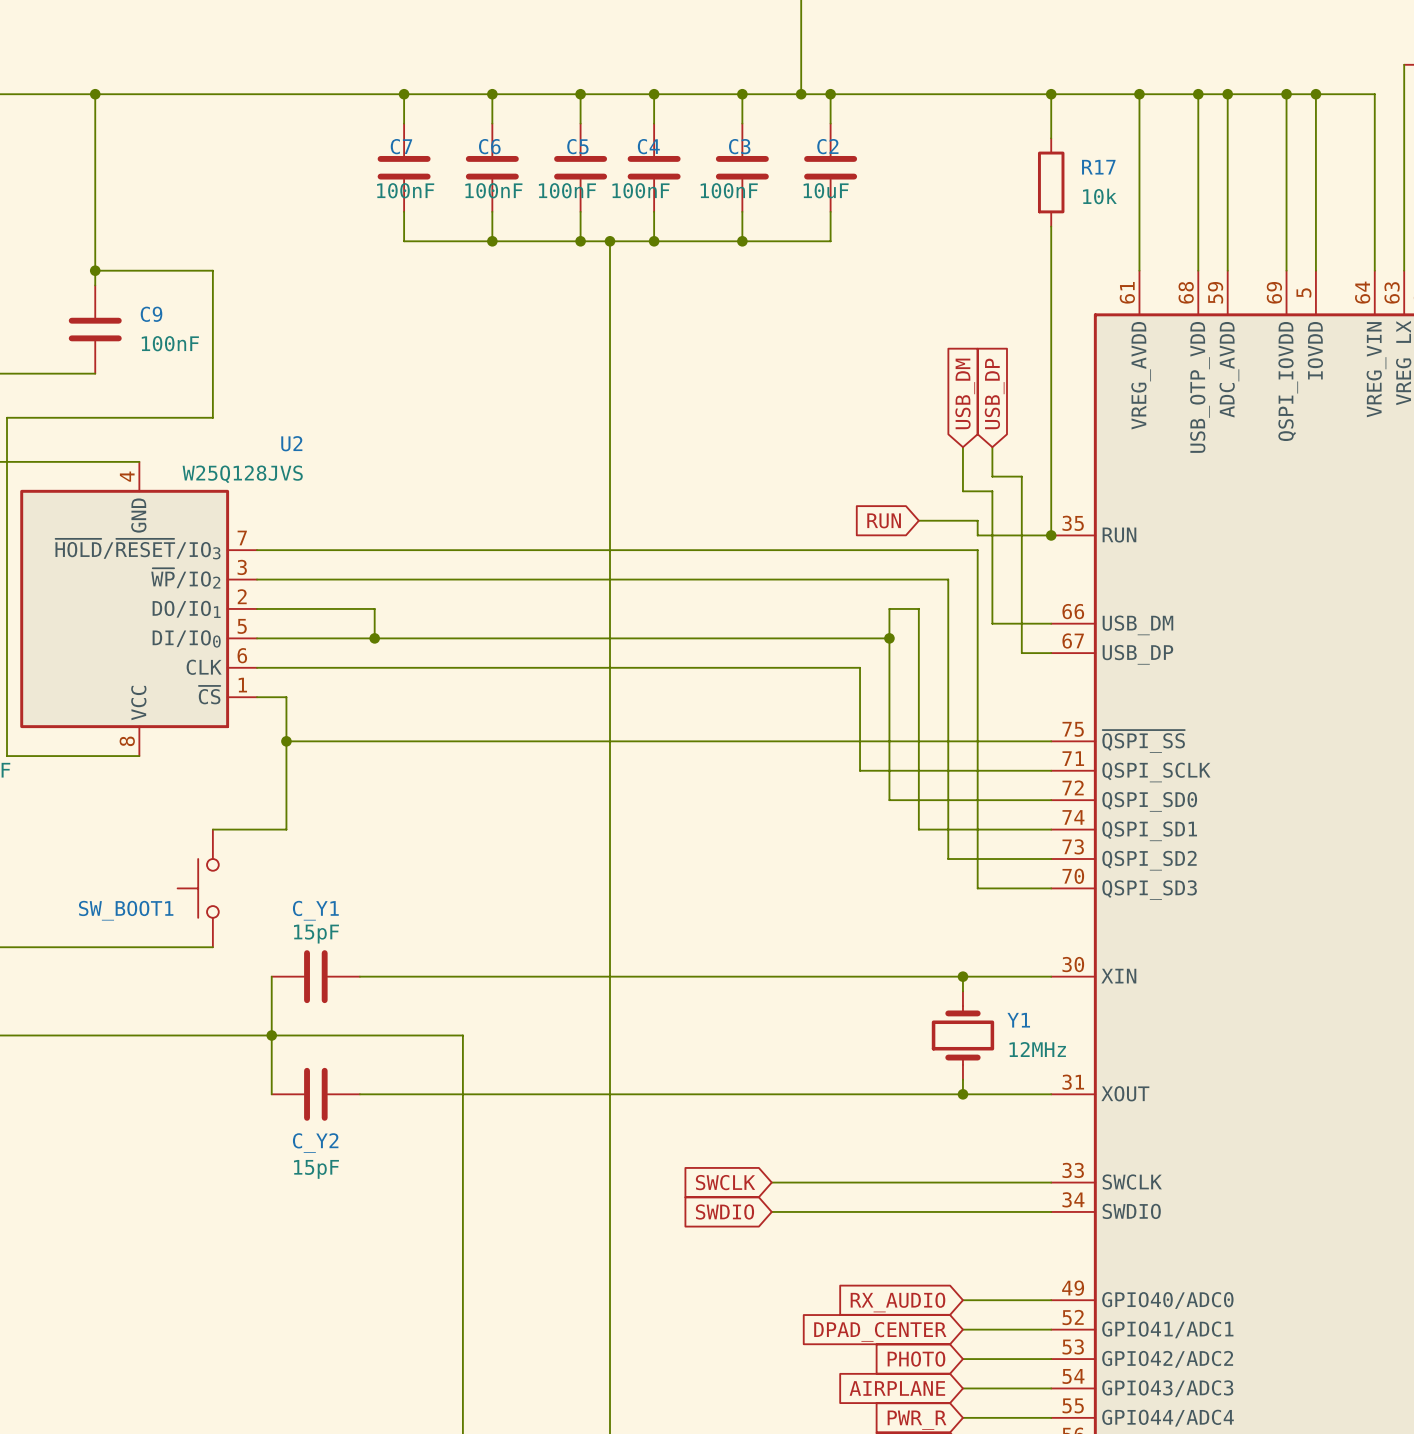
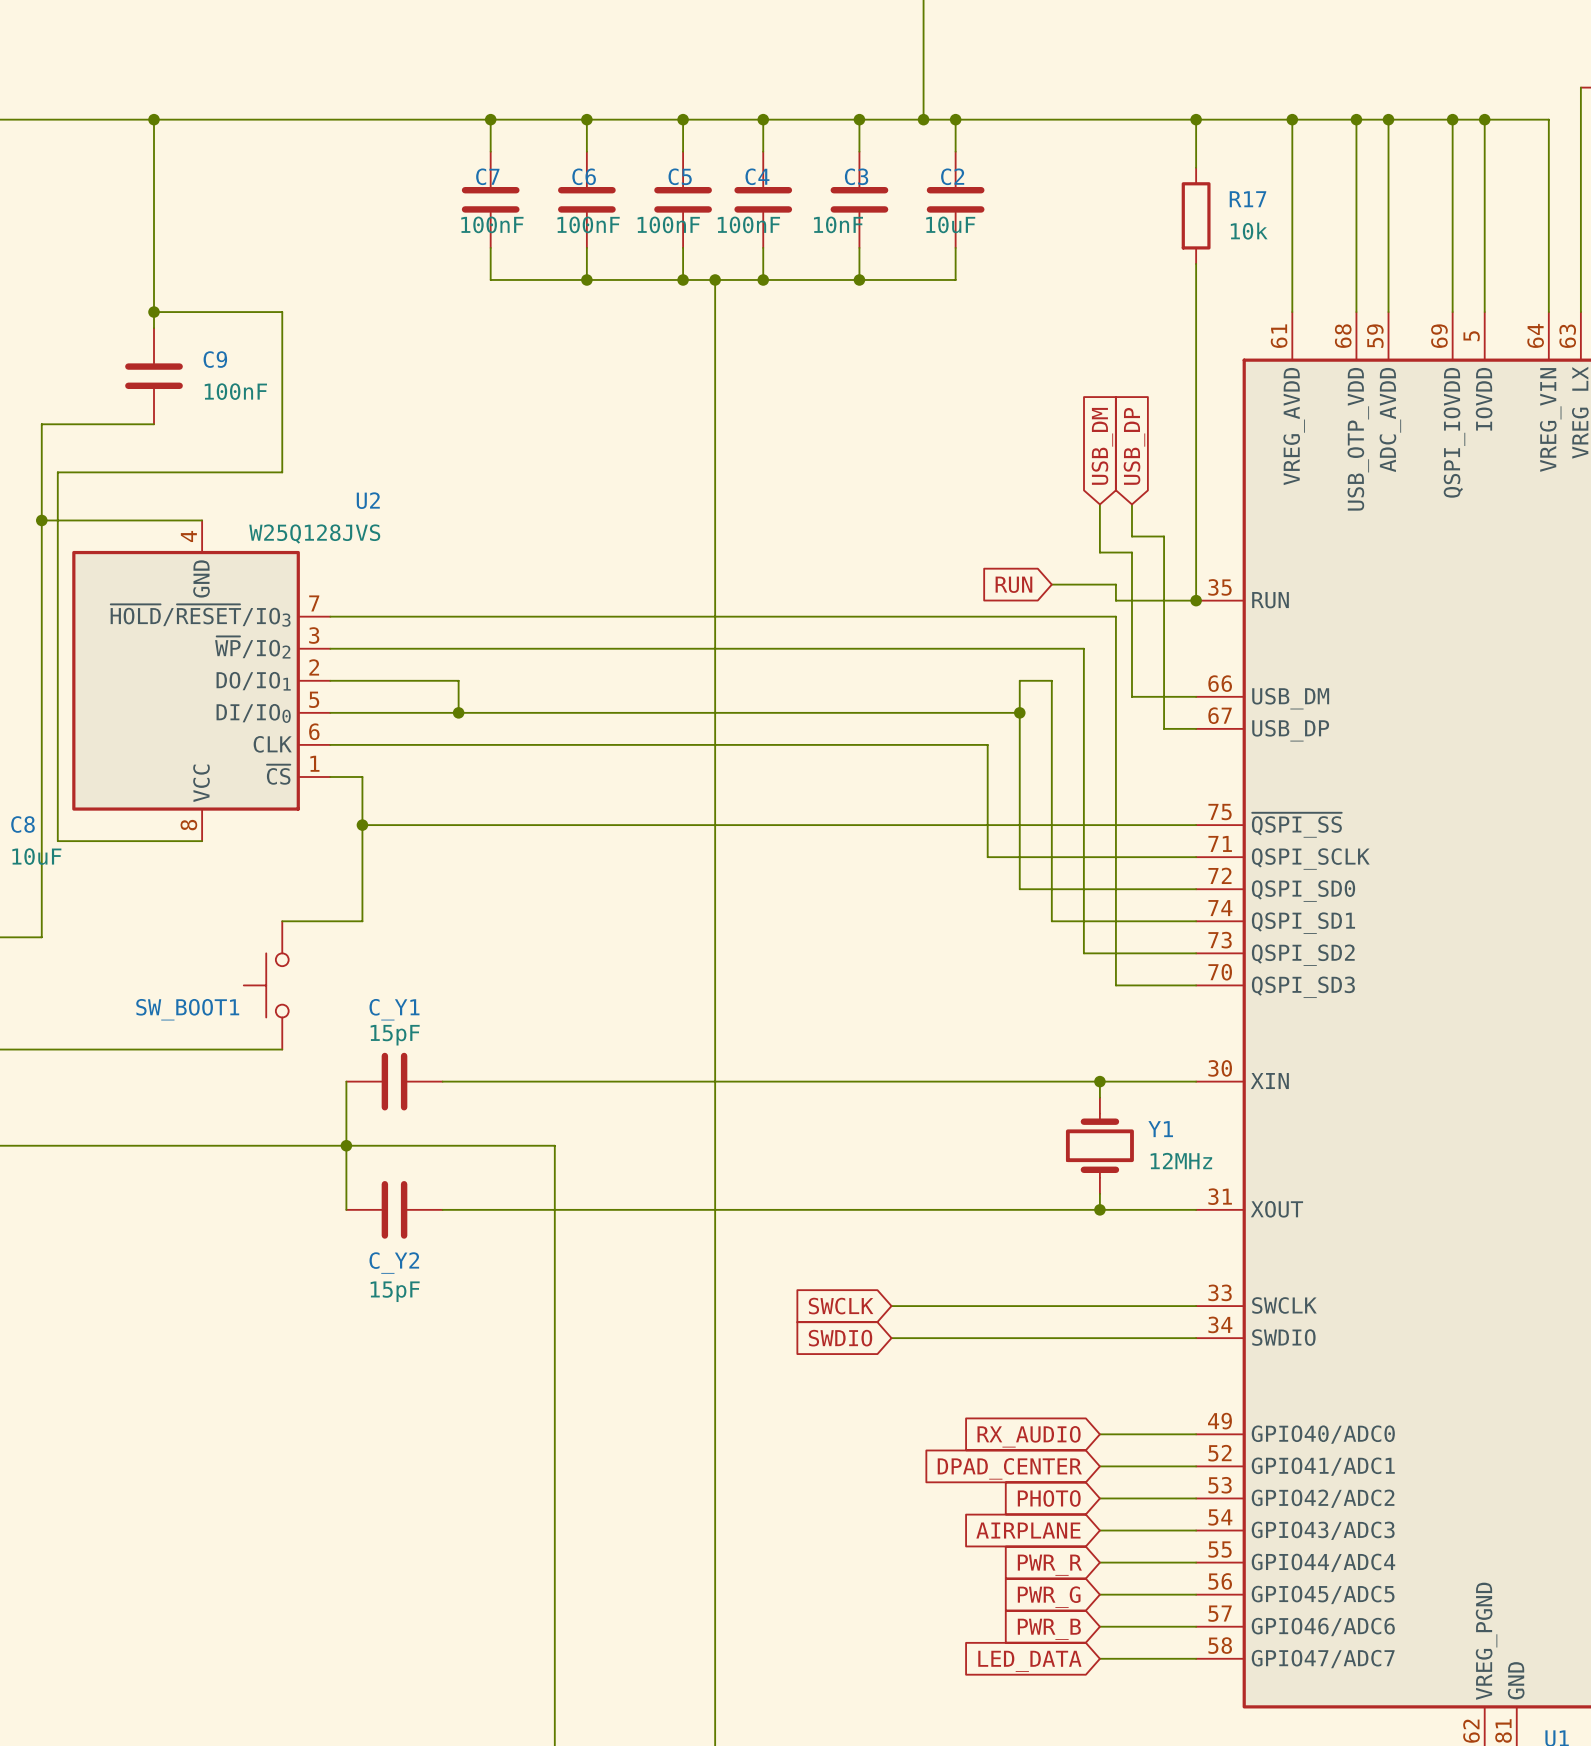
C3 value: 100nF (729, 190) -> 10nF (838, 224)

